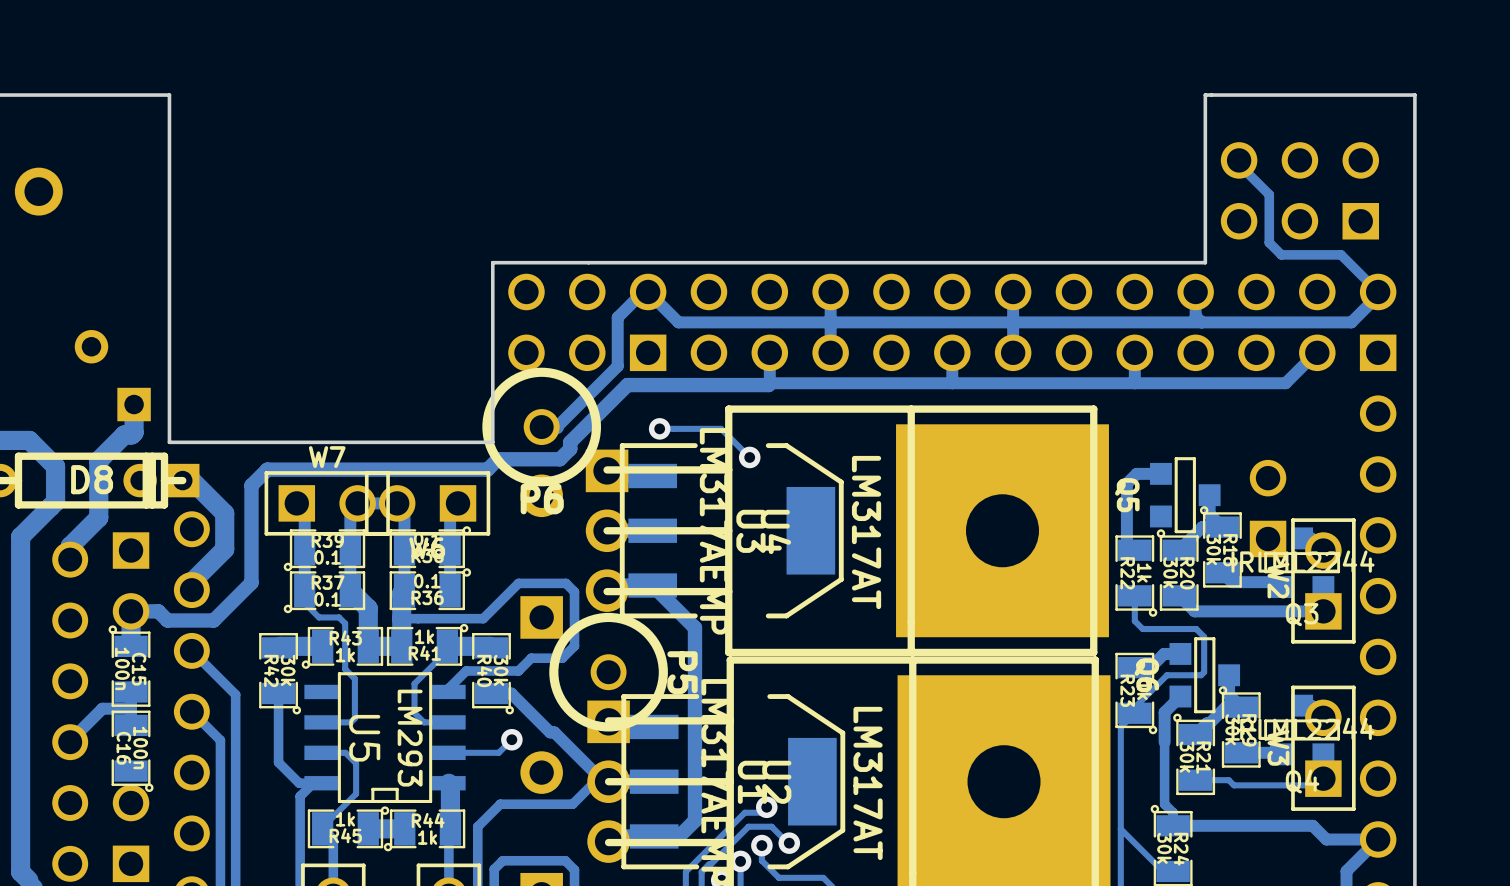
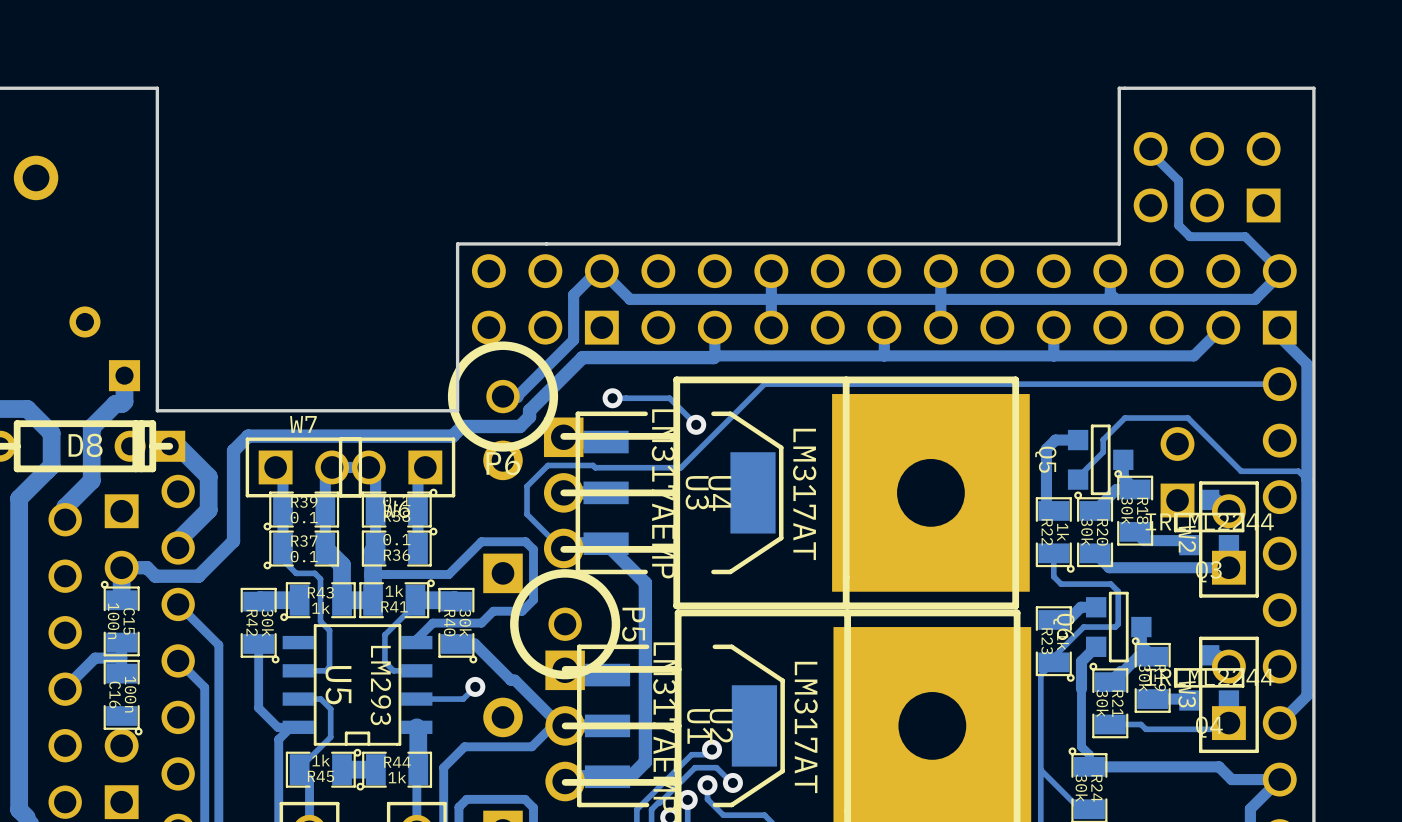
track: none -> (1279, 327) (1279, 336) (1306, 364) (1306, 695) (1279, 723)
track: none -> (1279, 384) (764, 384) (680, 467) (547, 465) (527, 486) (527, 514) (561, 548) (563, 548)
track: none -> (1306, 479) (1298, 471) (1241, 471) (1187, 418) (1124, 418) (1103, 439) (1103, 452) (1078, 477) (1078, 479)

